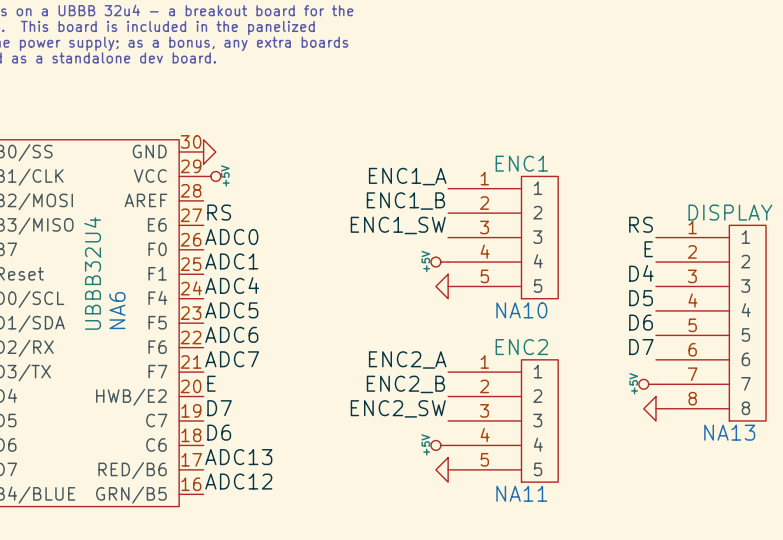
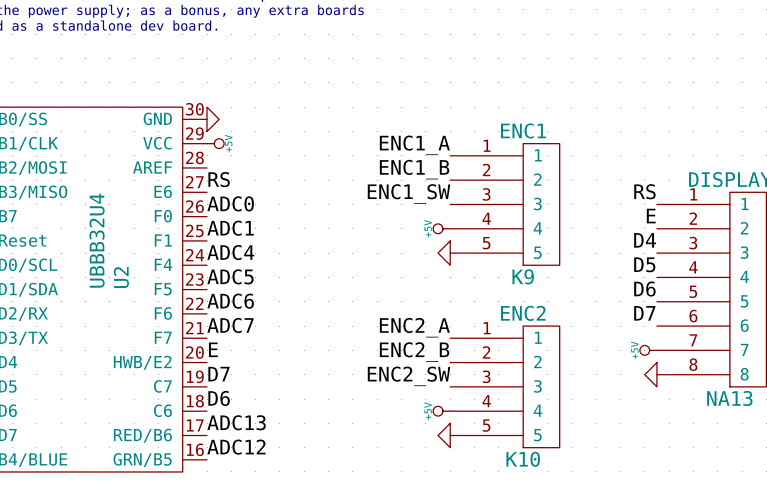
NA6 name: NA6 (117, 310) -> U2 (121, 277)
NA10 name: NA10 (521, 310) -> K9 (523, 276)
NA11 name: NA11 (521, 493) -> K10 (523, 459)

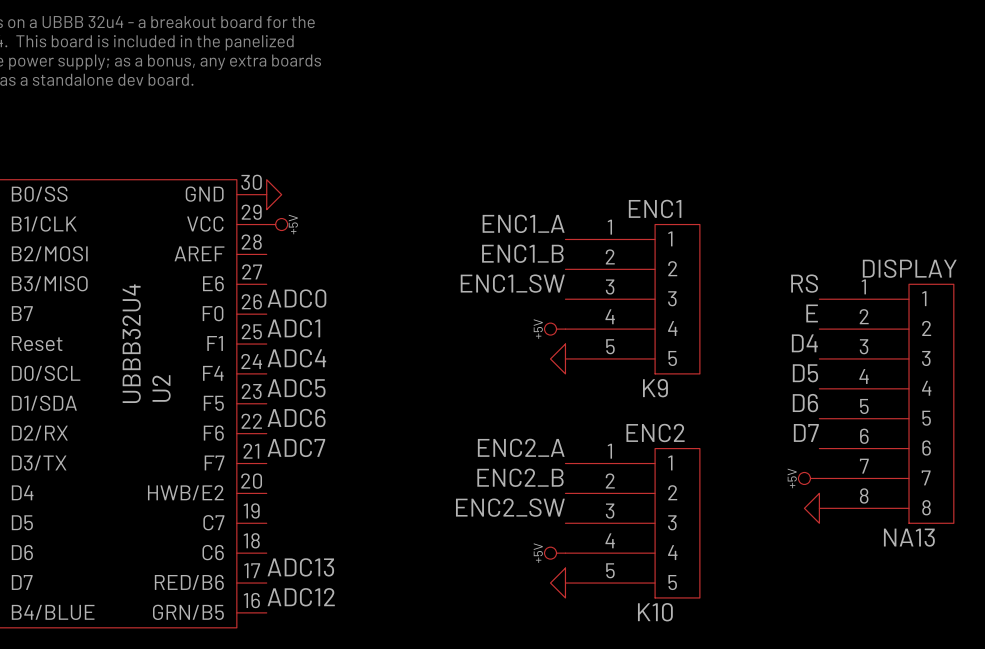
label: RS (219, 179) -> none
label: E (213, 349) -> none
label: D7 (218, 374) -> none
label: D6 (219, 398) -> none

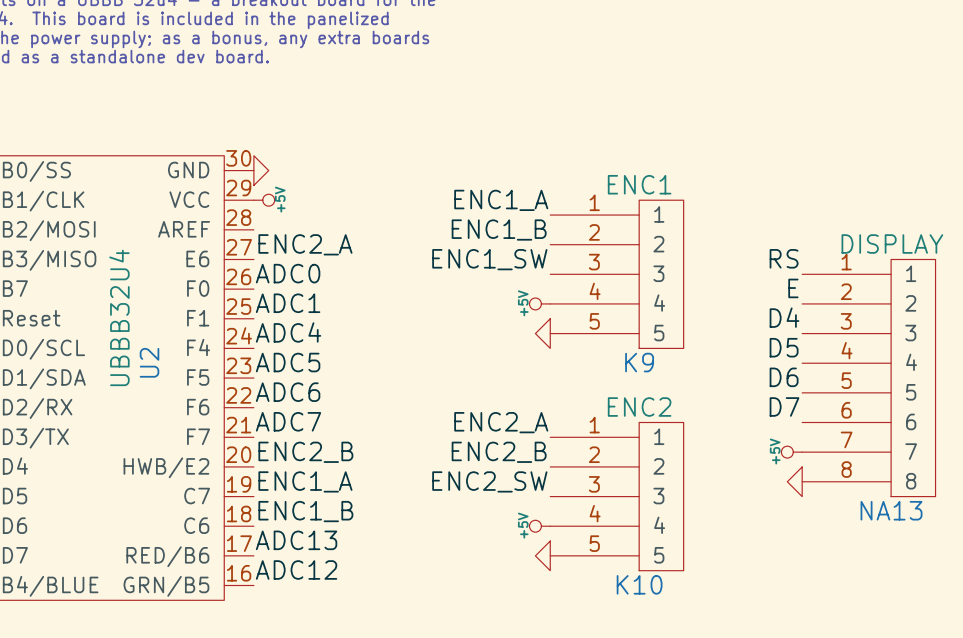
label: none -> ENC2_A (305, 244)
label: none -> ENC2_B (305, 452)
label: none -> ENC1_A (305, 481)
label: none -> ENC1_B (305, 511)

